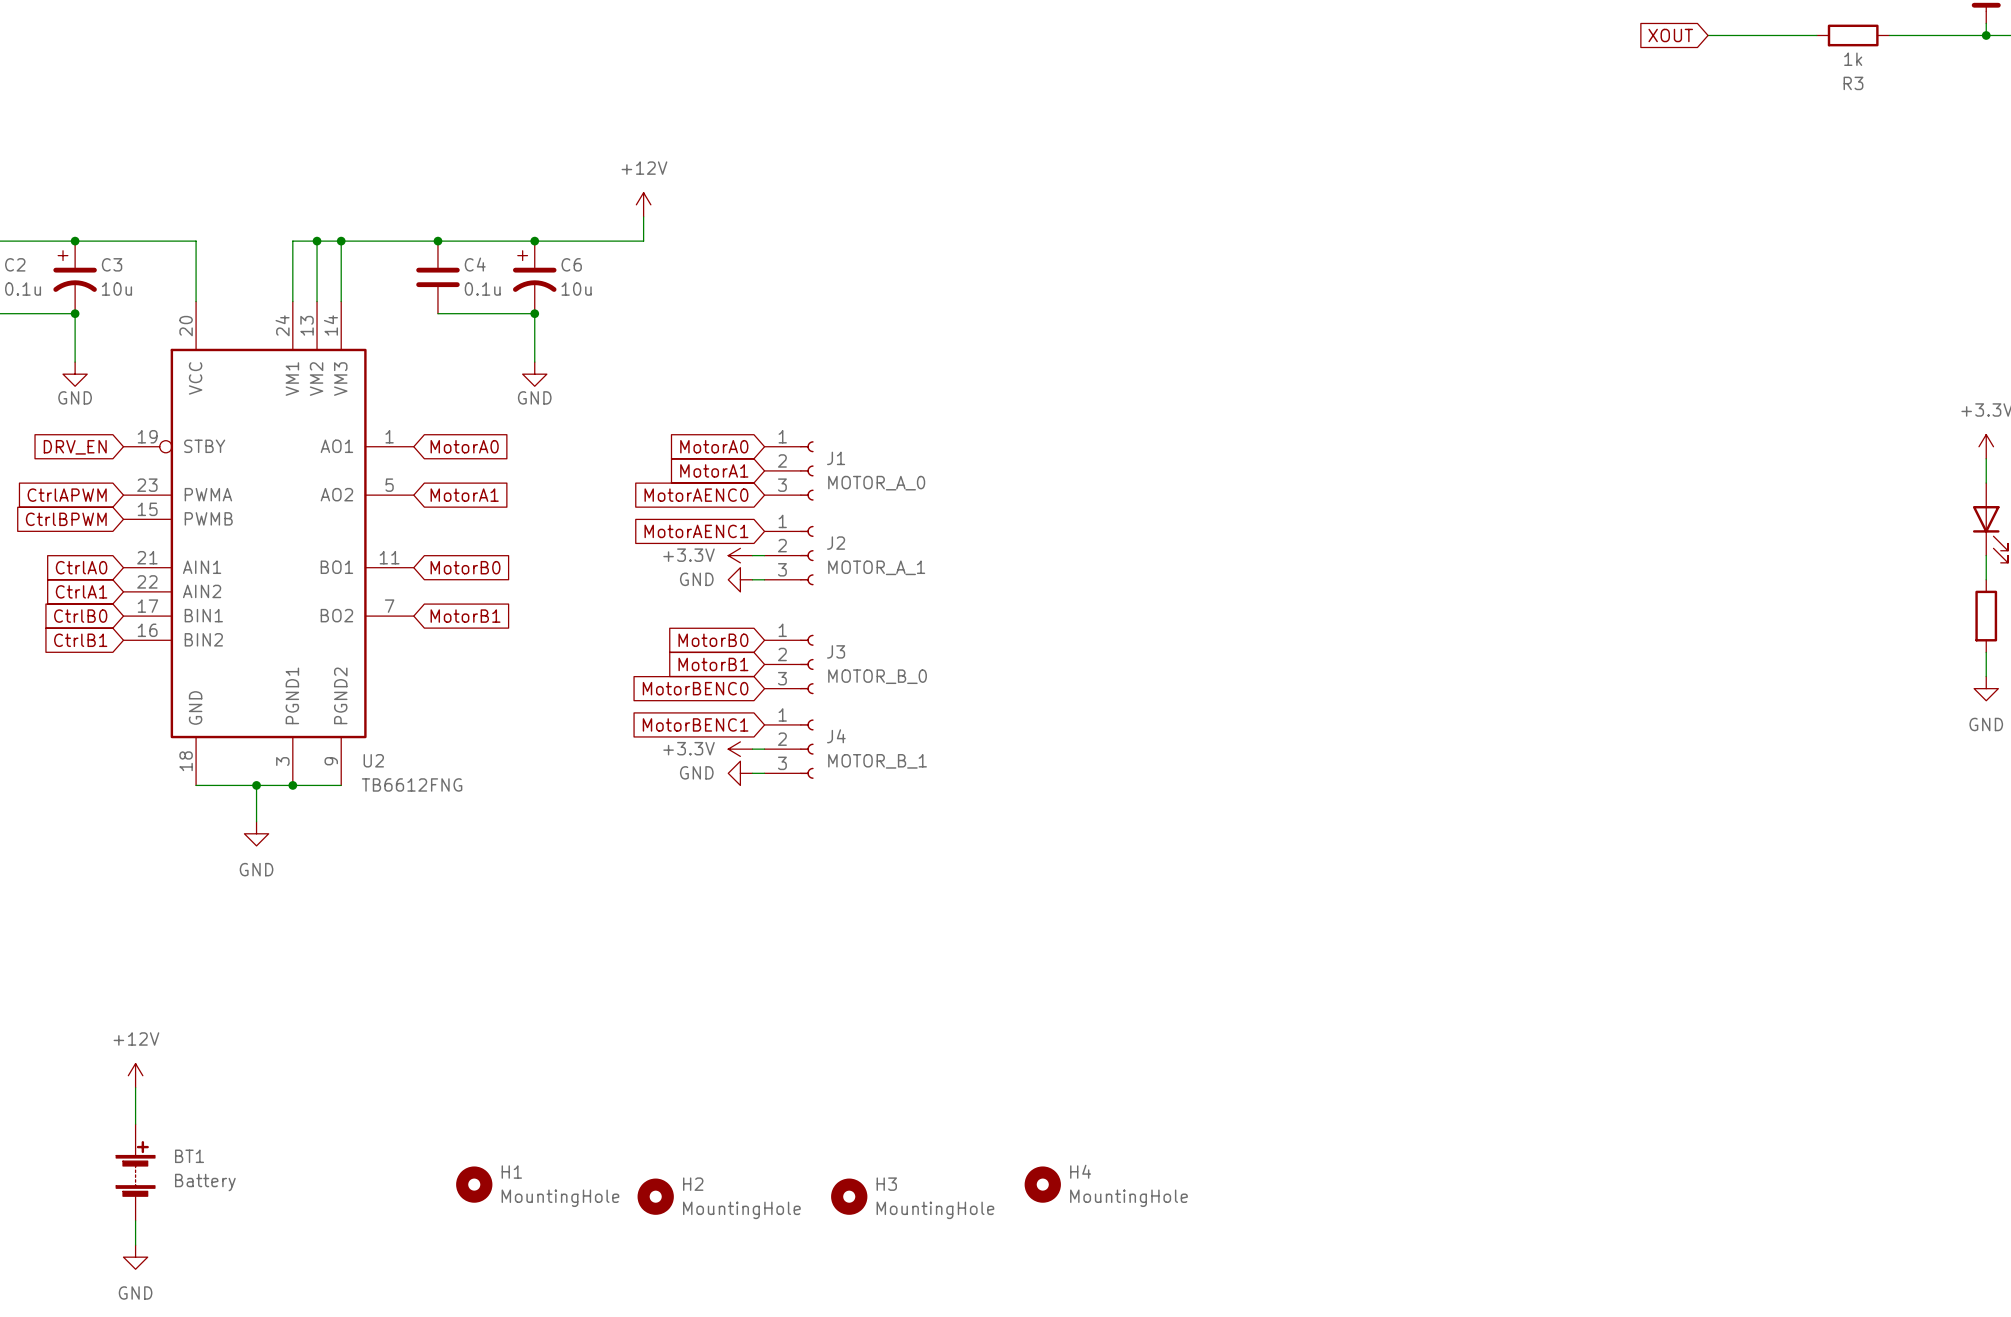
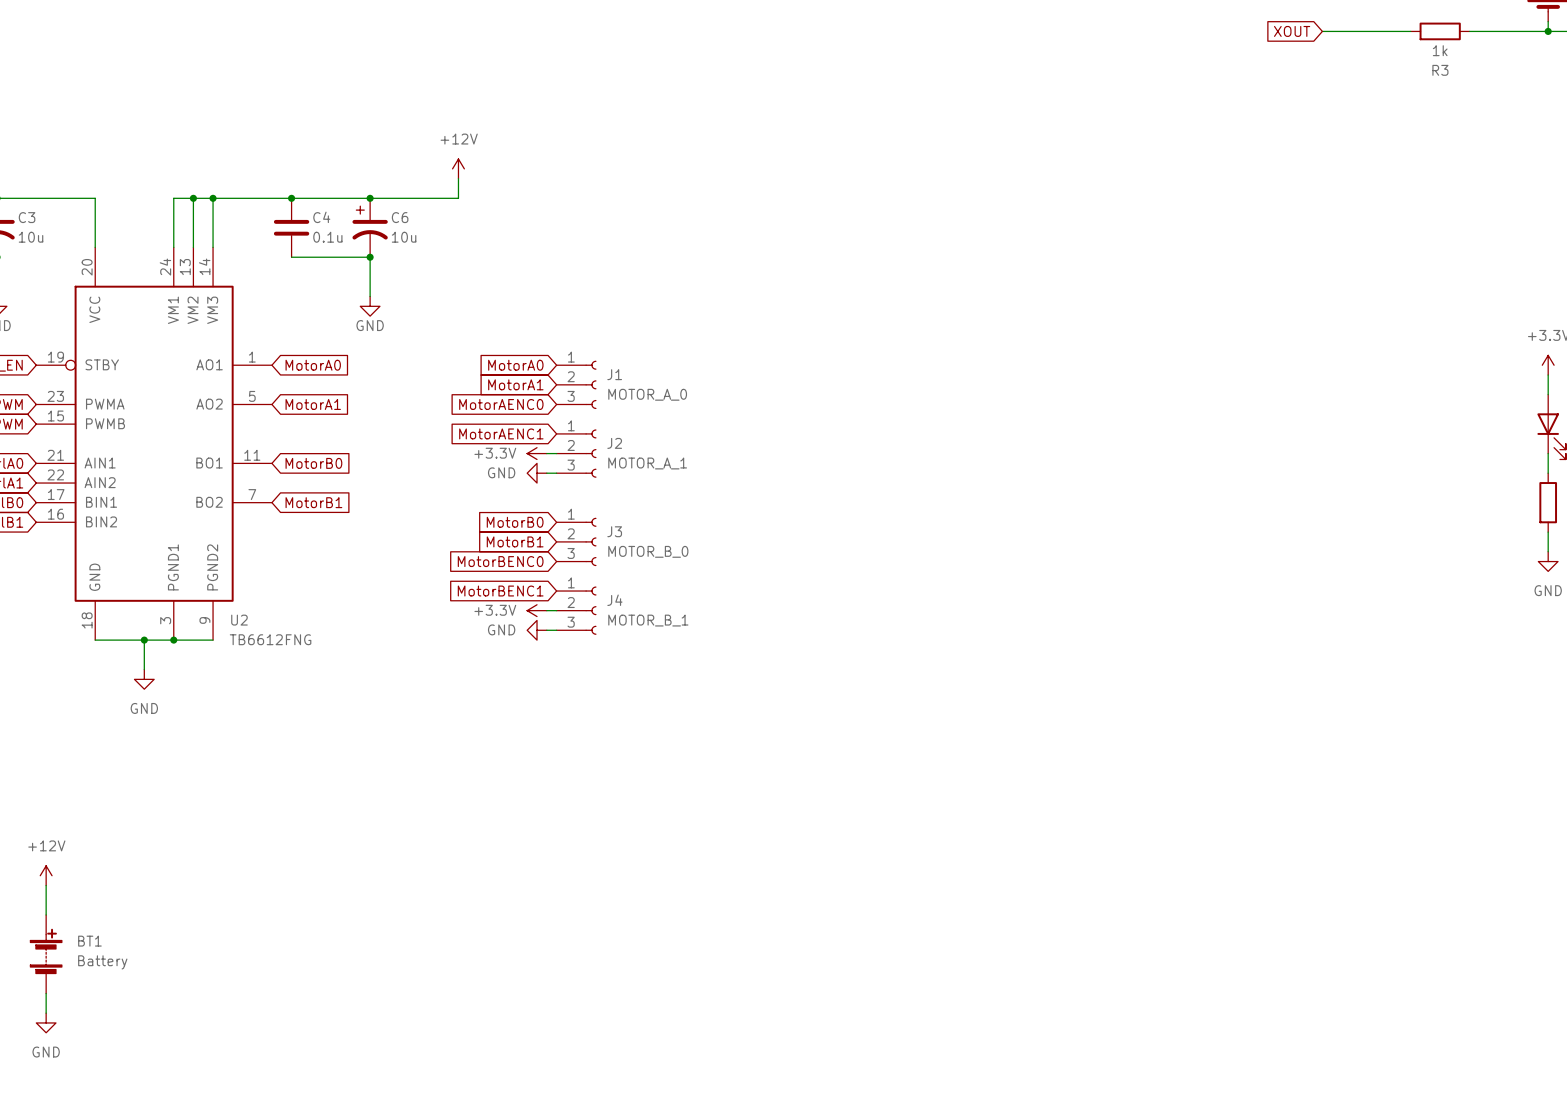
H1: MountingHole (474, 1184) -> none
H4: MountingHole (1042, 1184) -> none
H2: MountingHole (655, 1196) -> none
H3: MountingHole (849, 1196) -> none

